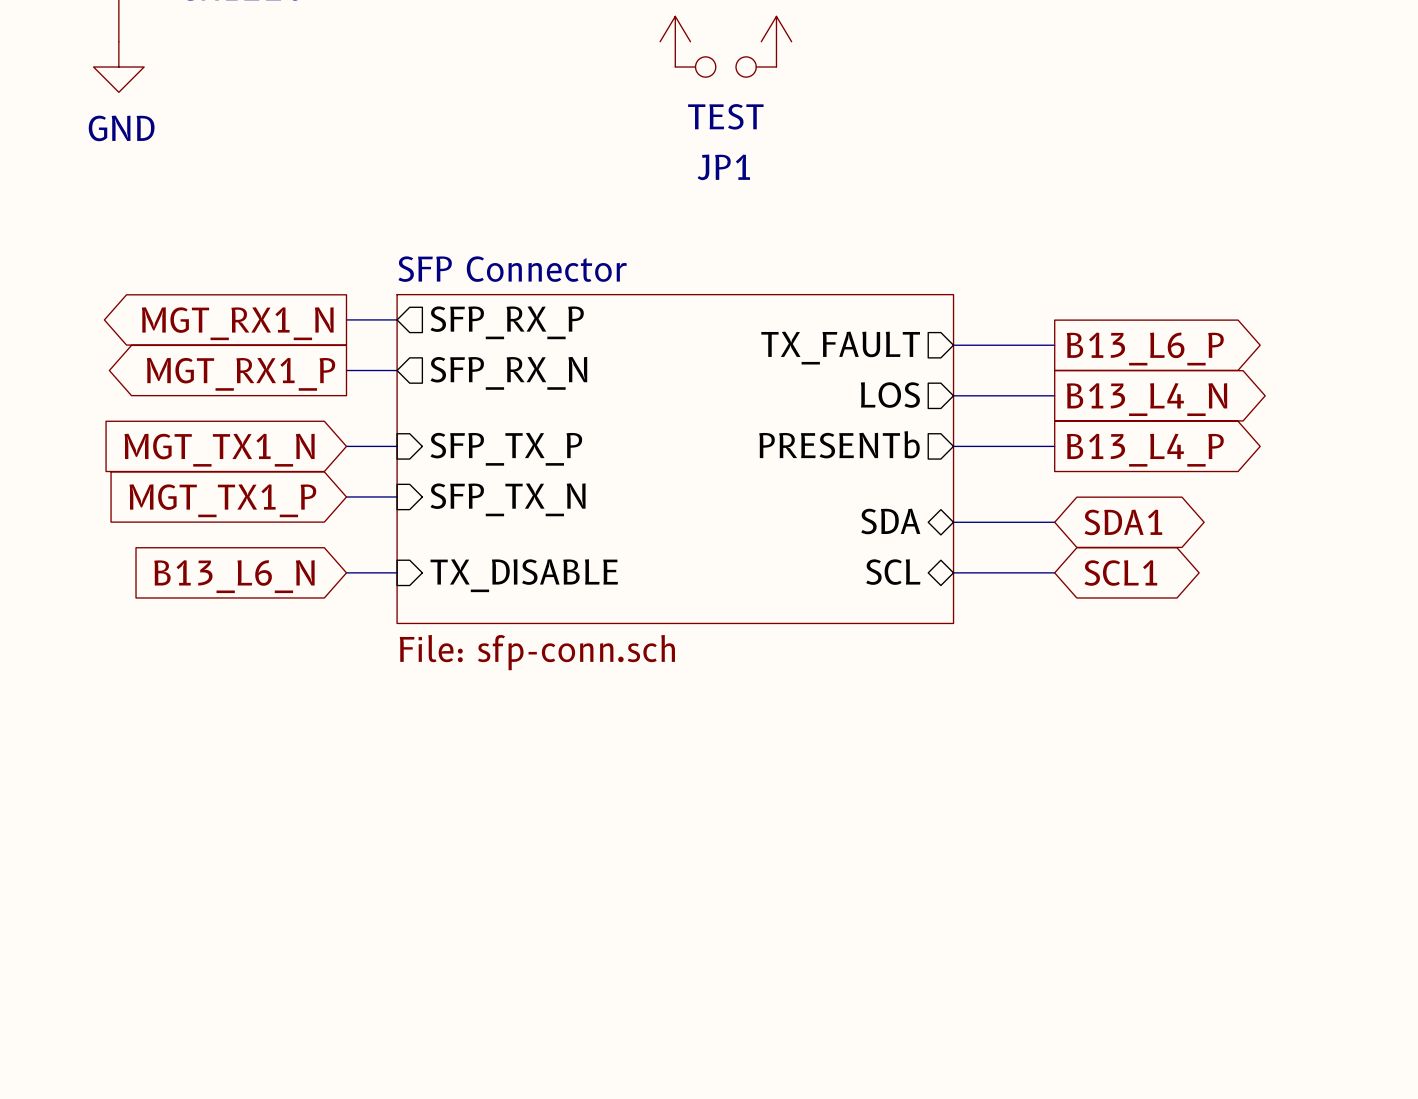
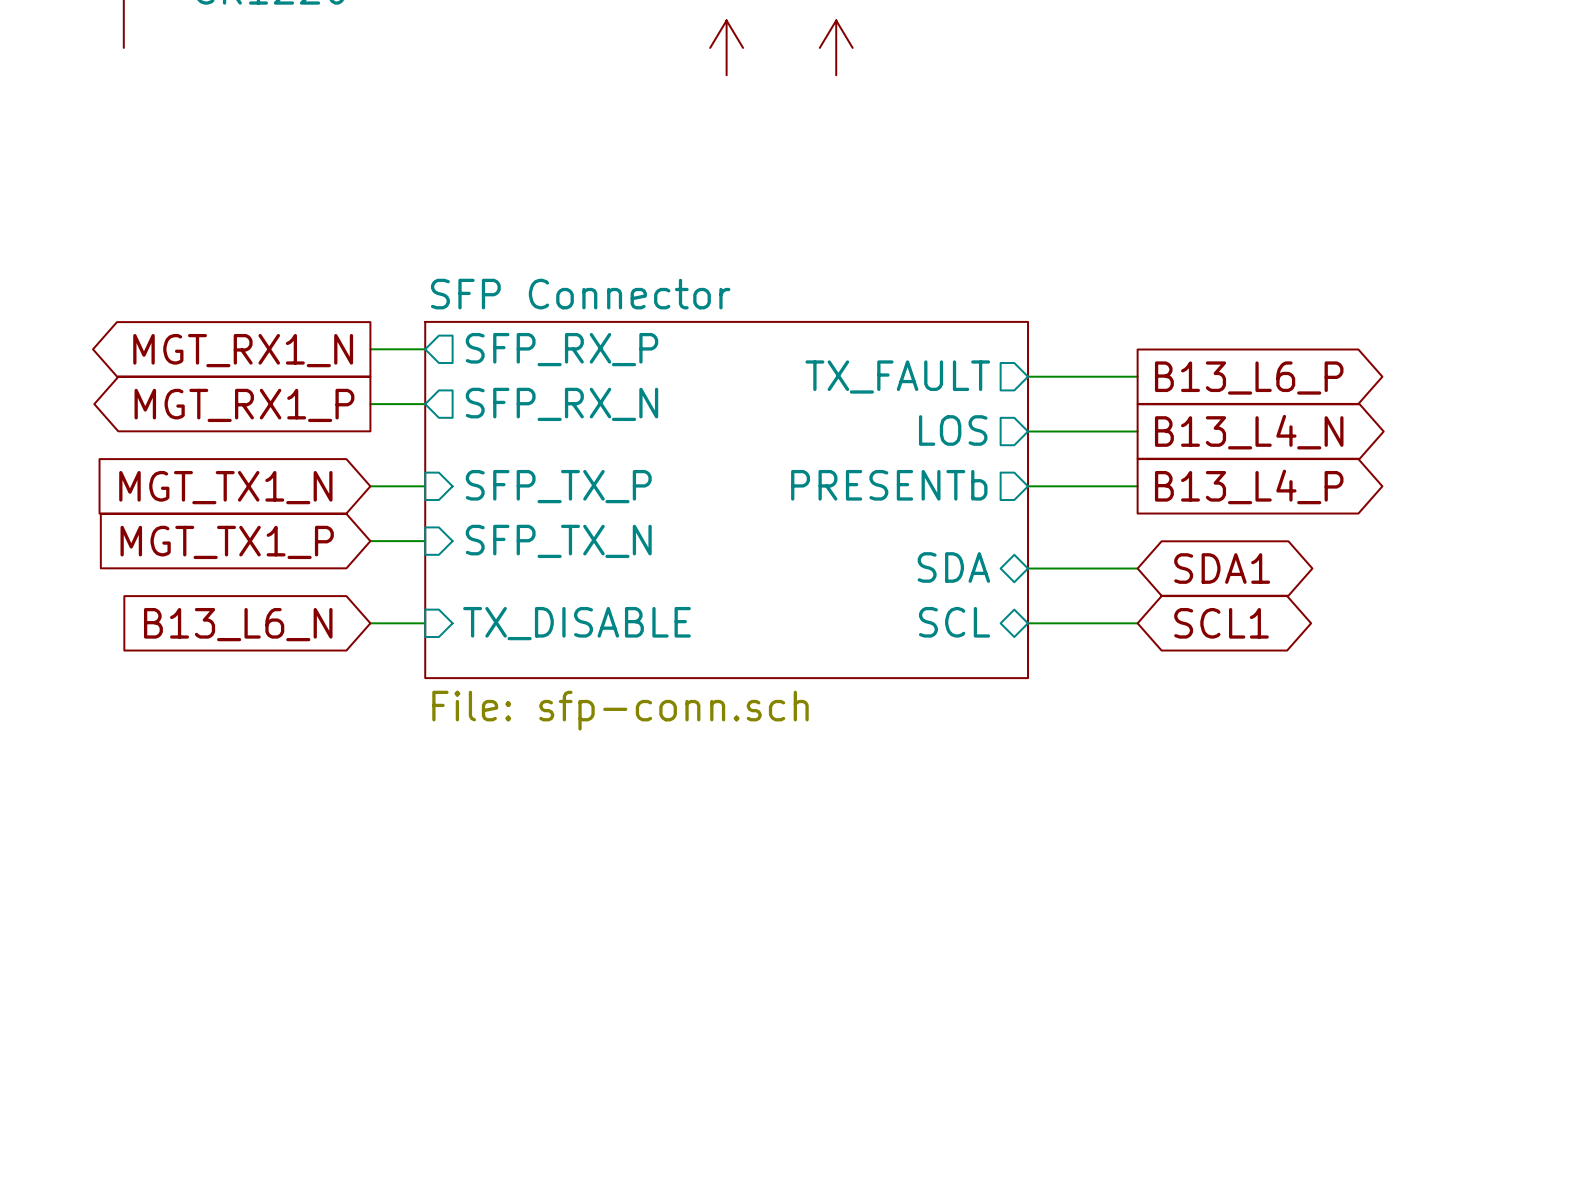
power symbol: GND (118, 67) -> none
JP1: TEST (725, 67) -> none

